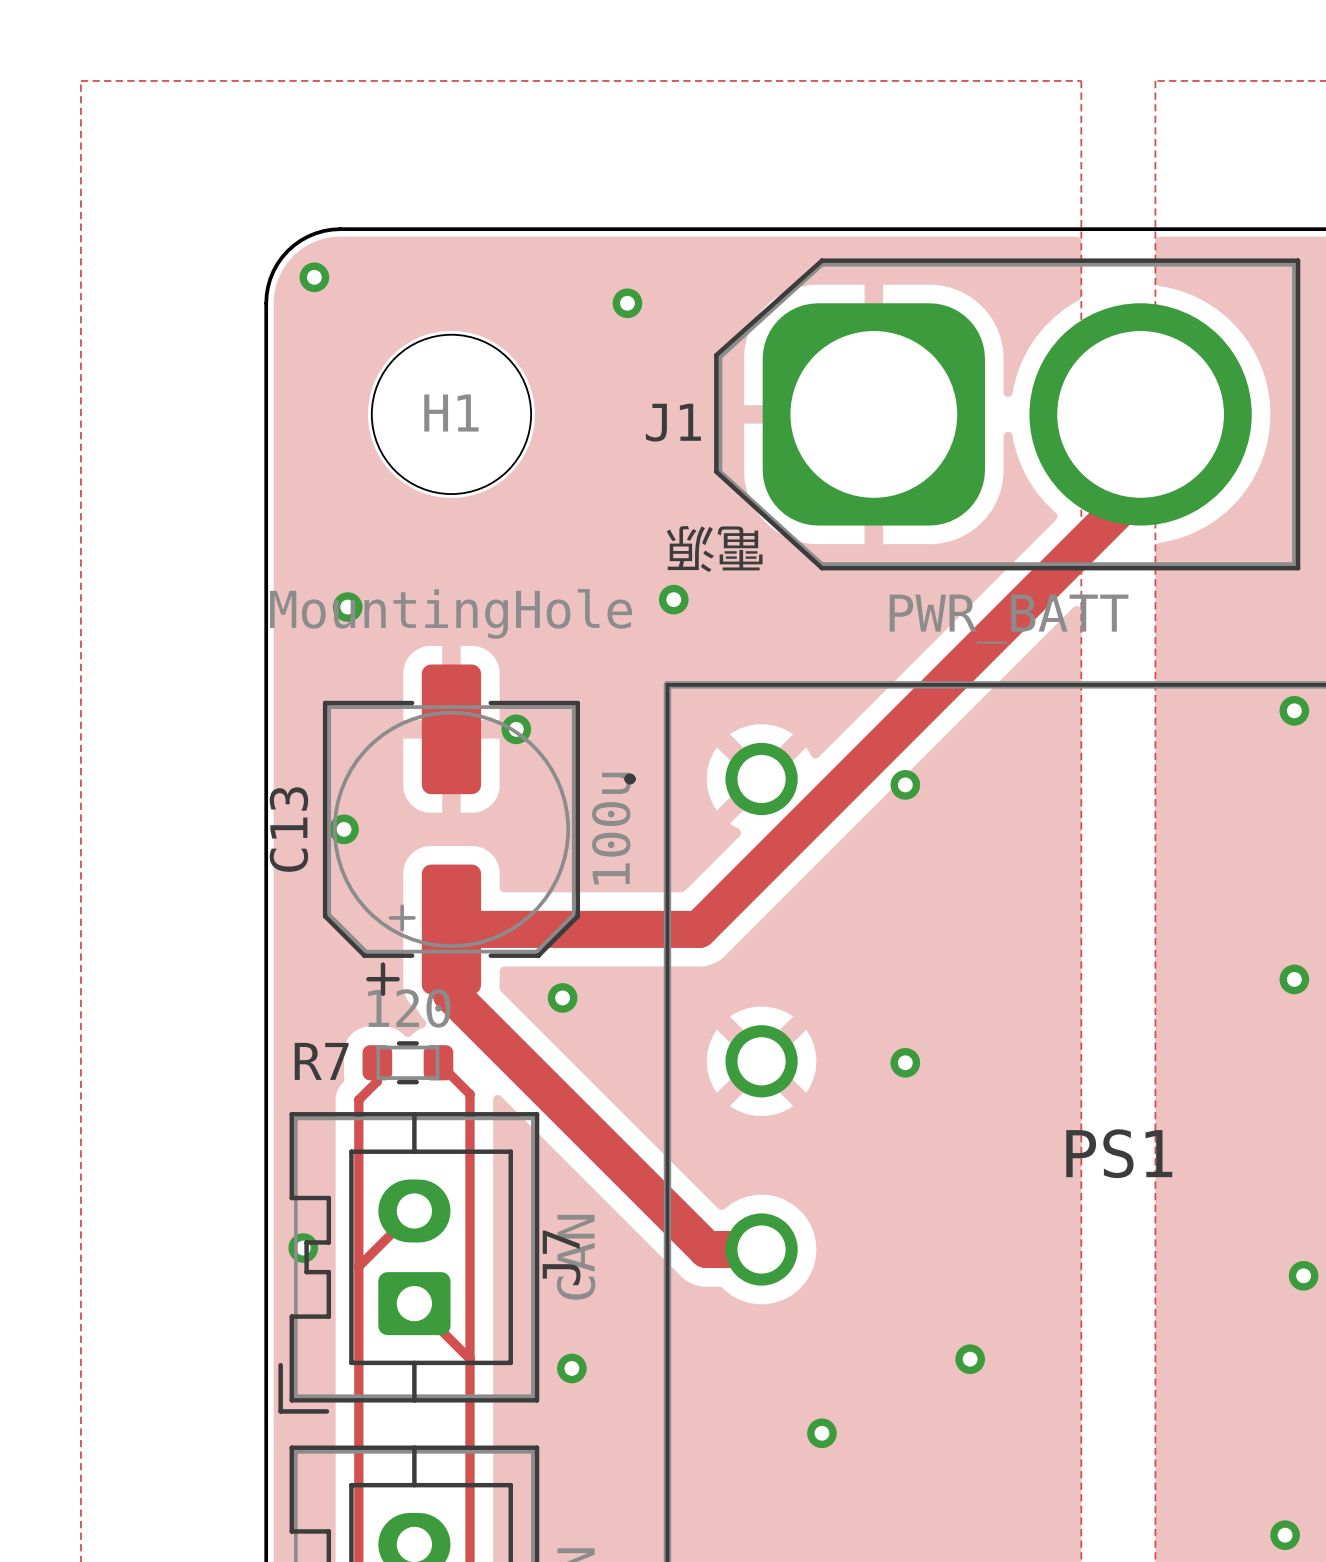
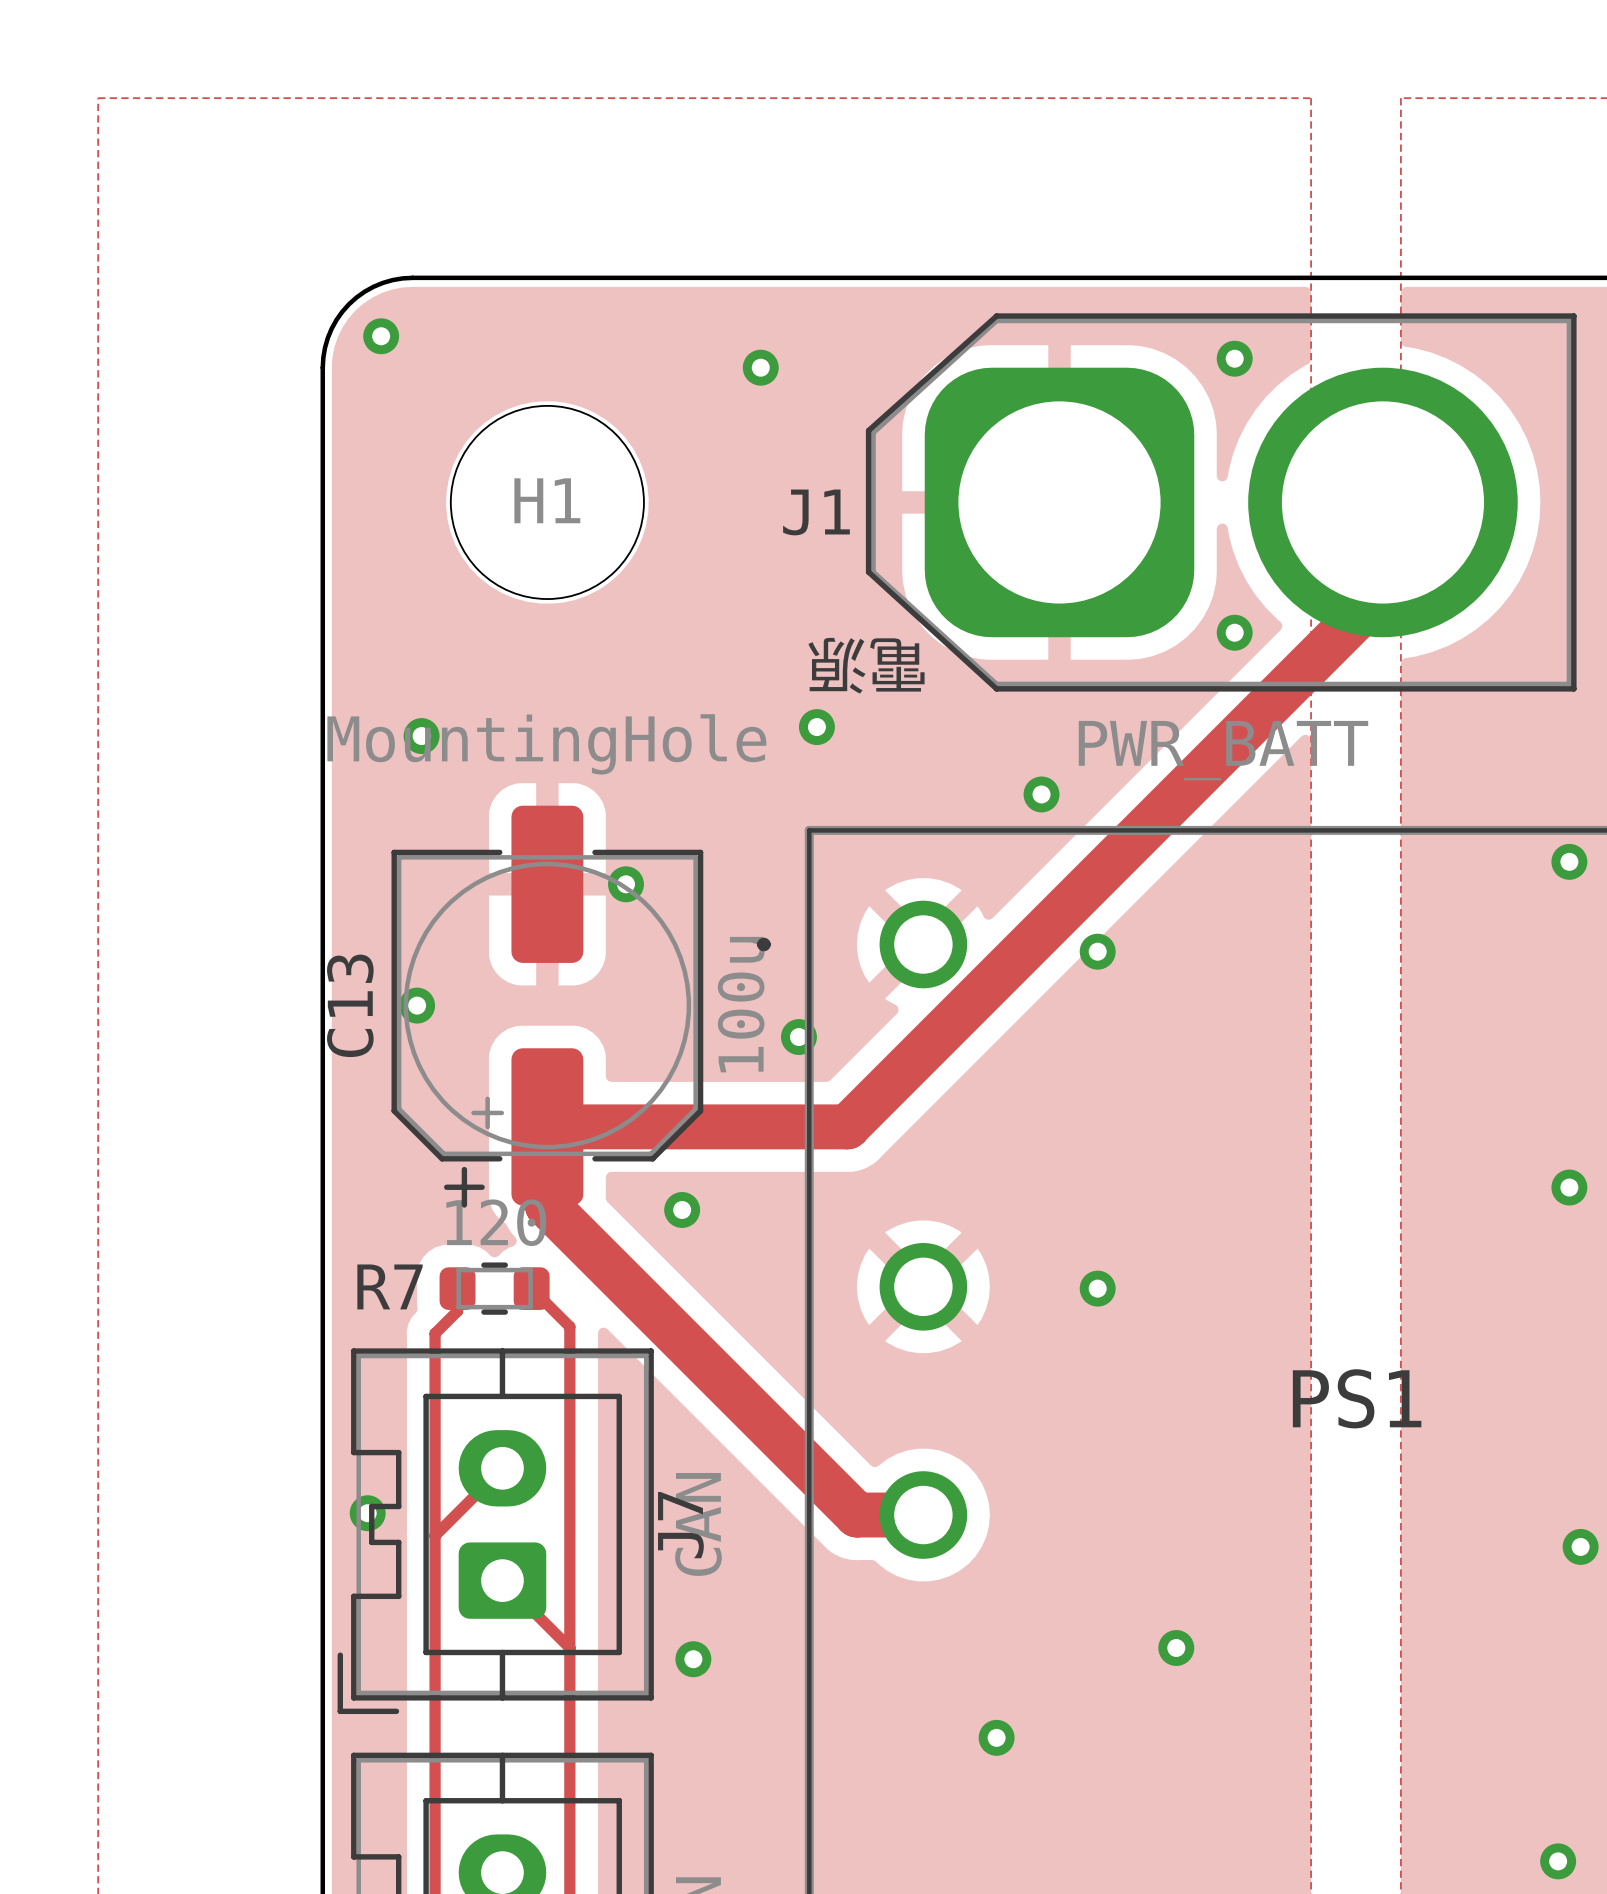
via: none -> (1234, 358)
via: none -> (1234, 632)
via: none -> (1041, 794)
via: none -> (798, 1037)

